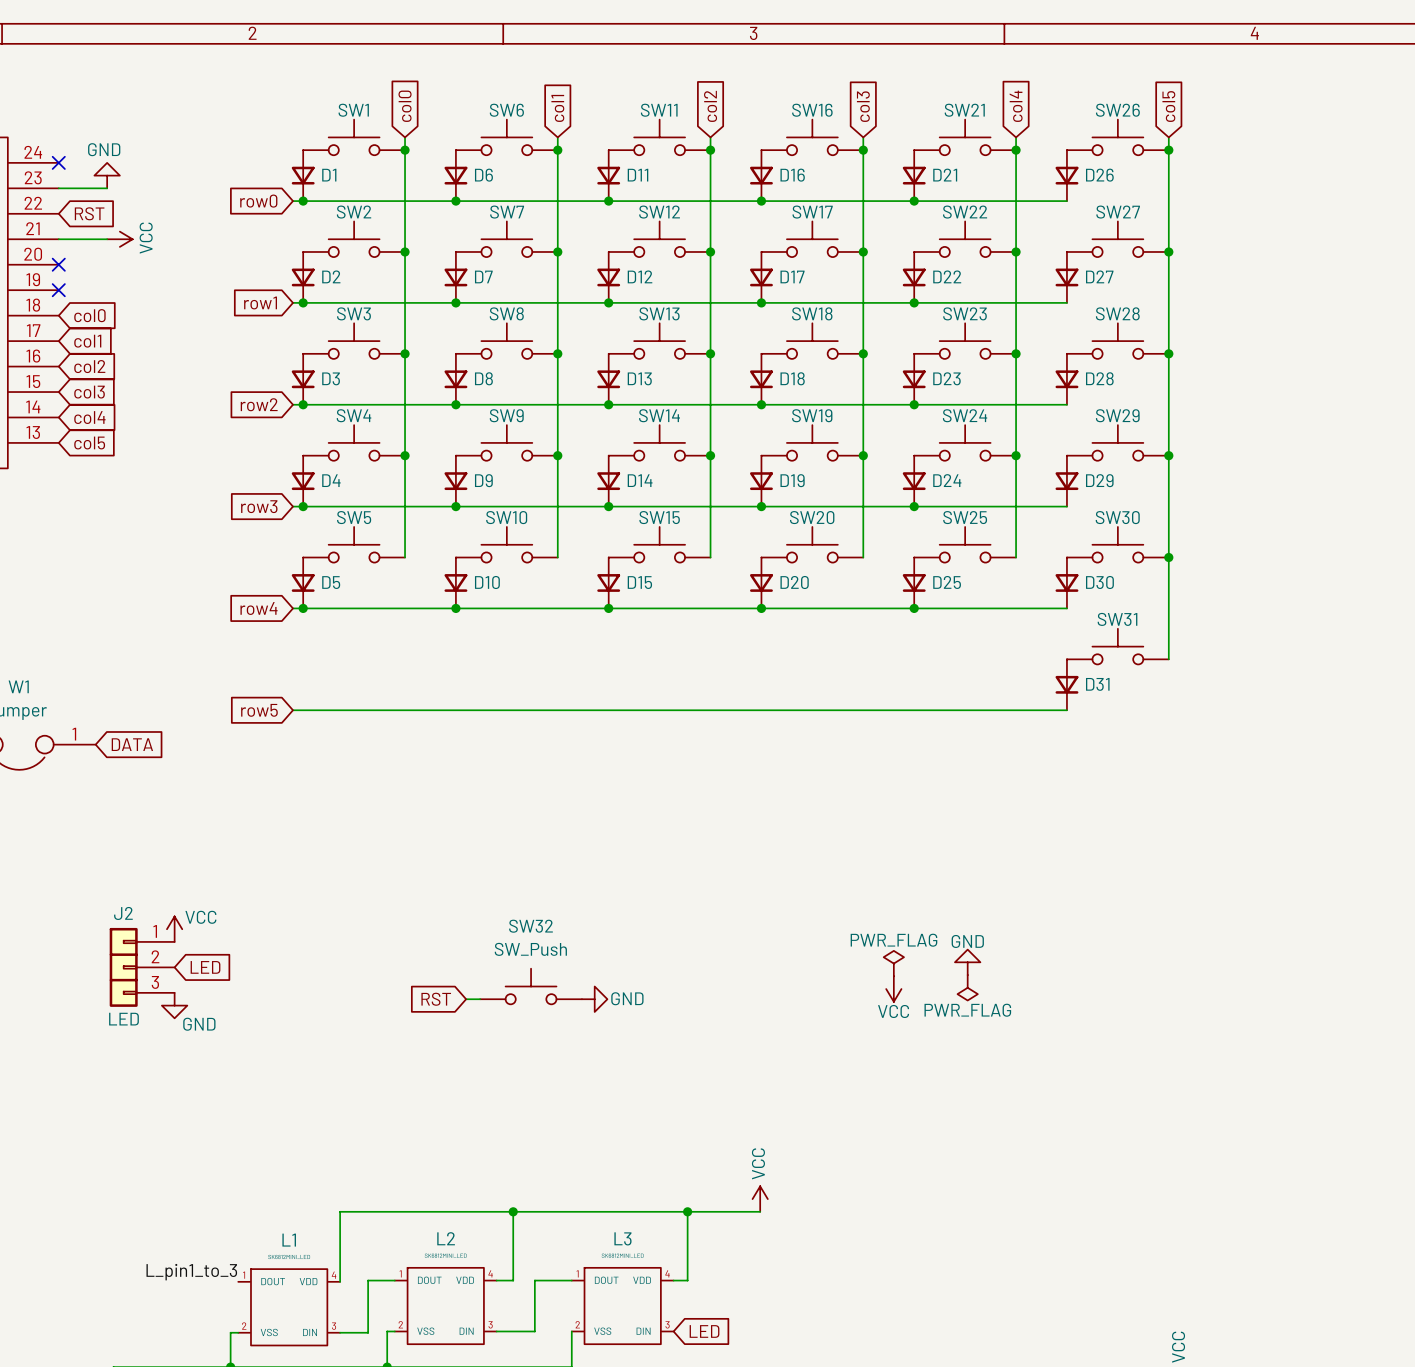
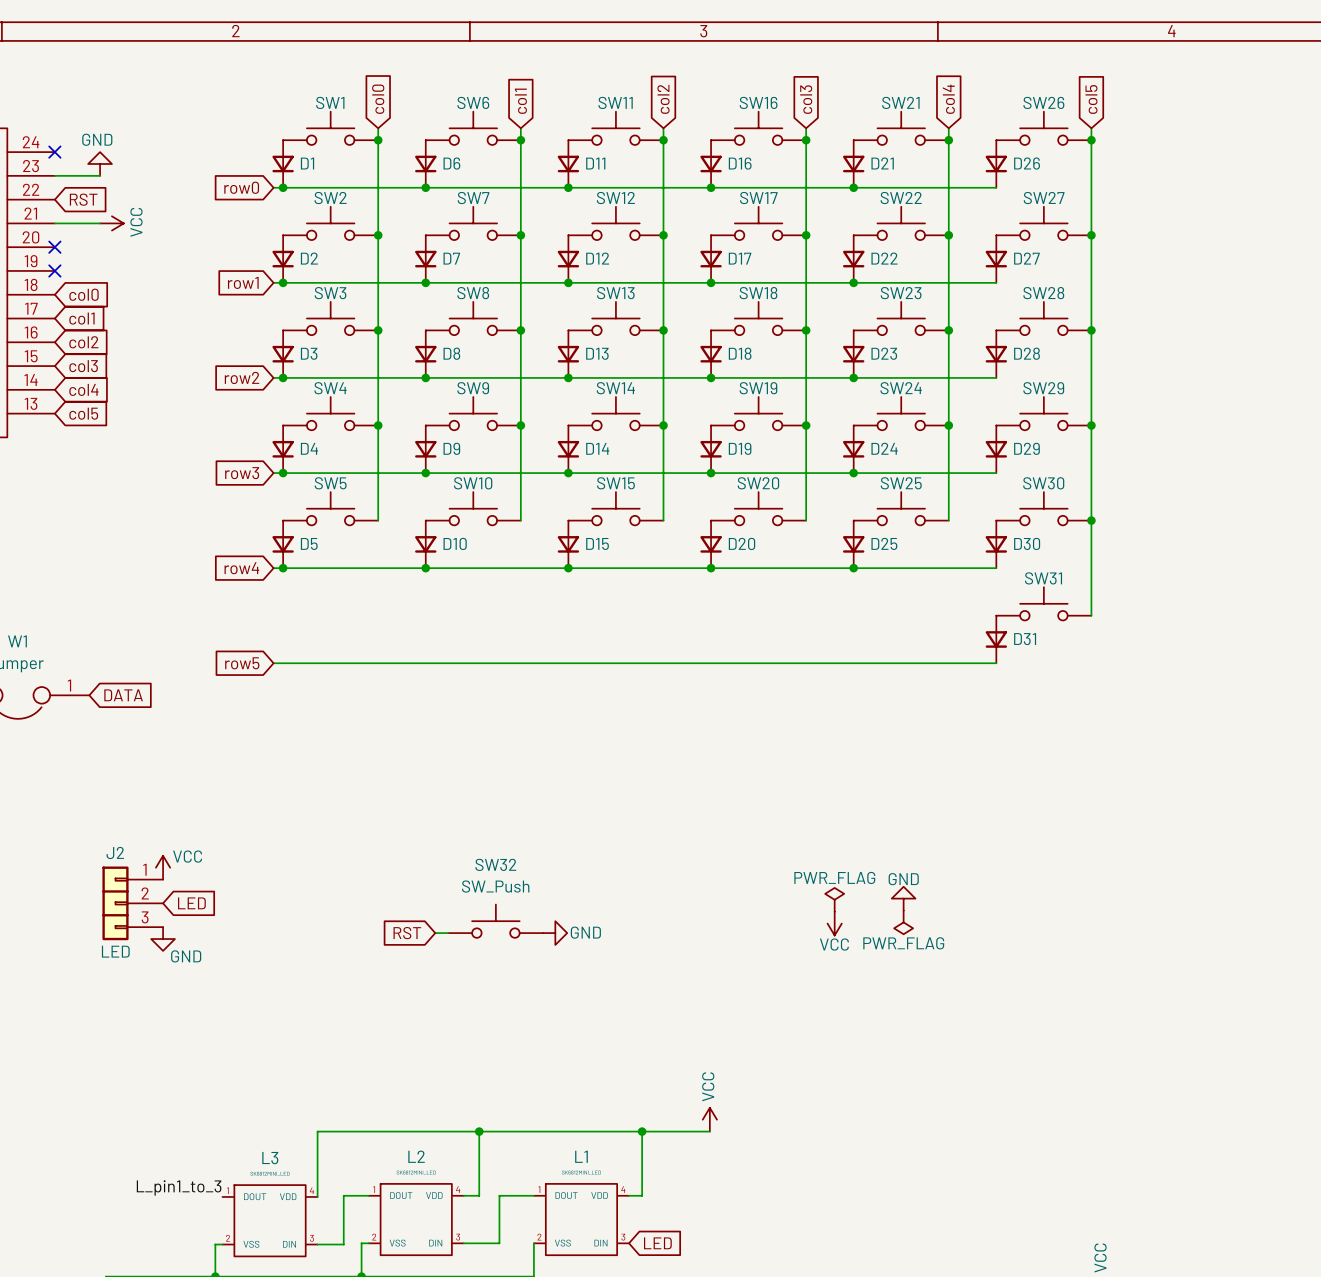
L3 name: L3 (622, 1238) -> L1 (581, 1156)
L1 name: L1 (289, 1240) -> L3 (270, 1158)

